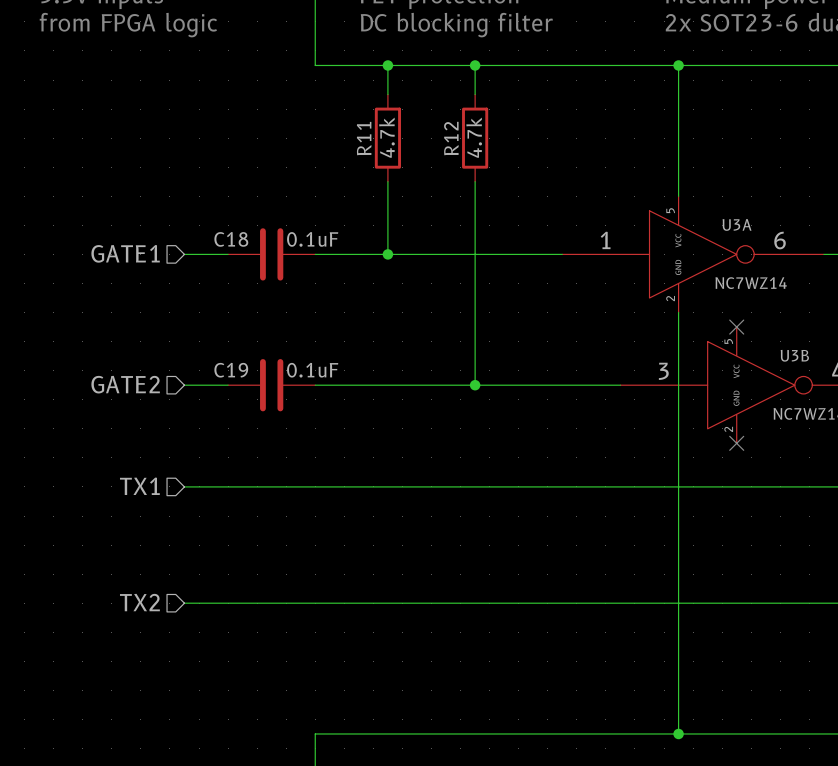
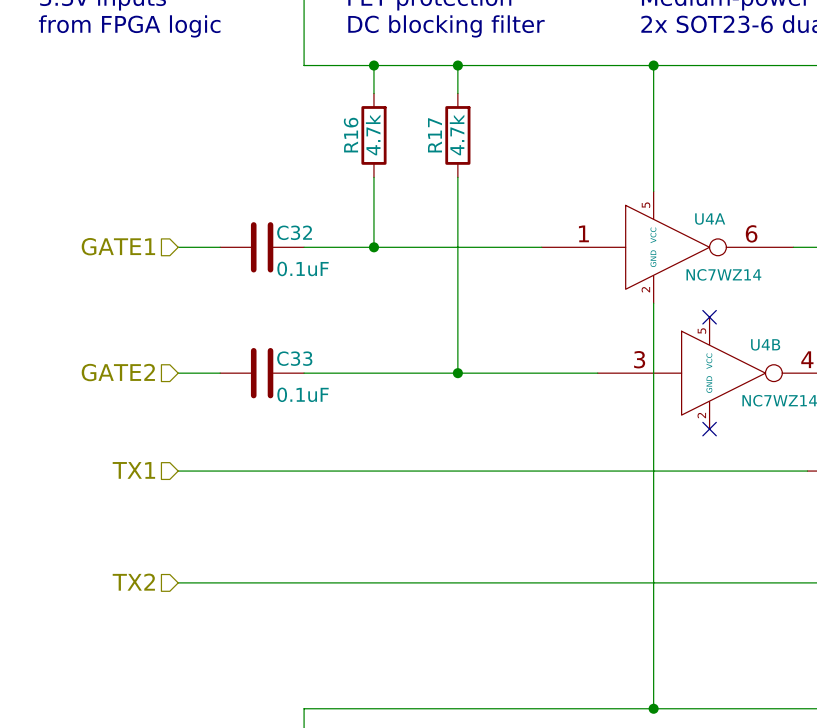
R11 name: R11 (364, 138) -> R16 (351, 135)
R12 name: R12 (451, 138) -> R17 (434, 135)
U3A name: U3A (737, 224) -> U4A (710, 219)
C18 name: C18 (231, 239) -> C32 (294, 232)
C18 value position: 0.1uF (312, 239) -> 0.1uF (303, 268)
U3B name: U3B (794, 355) -> U4B (765, 344)
C19 name: C19 (231, 370) -> C33 (294, 358)
C19 value position: 0.1uF (312, 370) -> 0.1uF (303, 394)

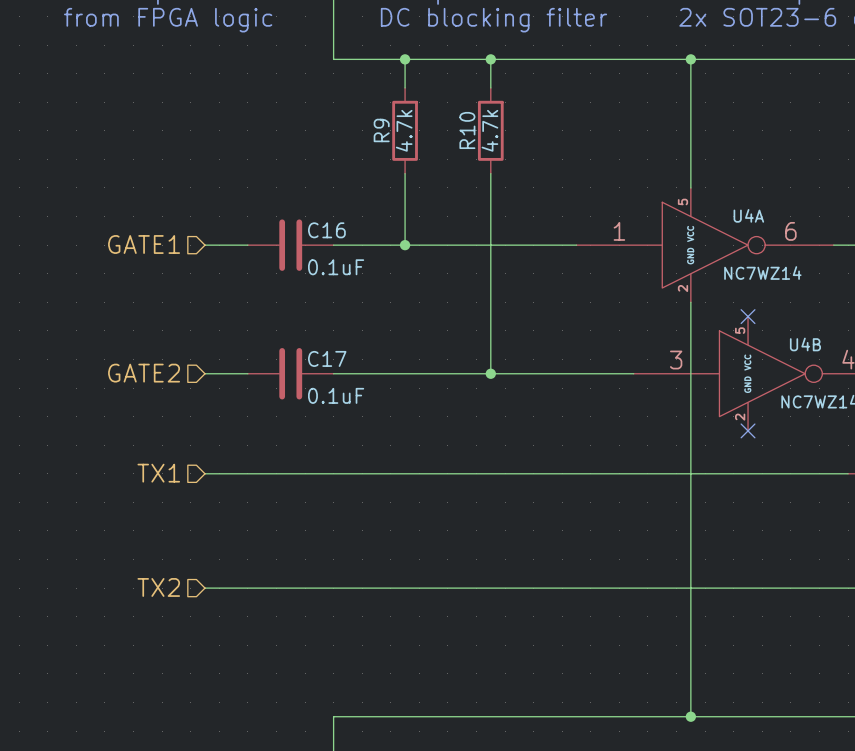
R16 name: R16 (351, 135) -> R9 (381, 130)
R17 name: R17 (434, 135) -> R10 (467, 130)
C32 name: C32 (294, 232) -> C16 (326, 230)
C33 name: C33 (294, 358) -> C17 (327, 358)

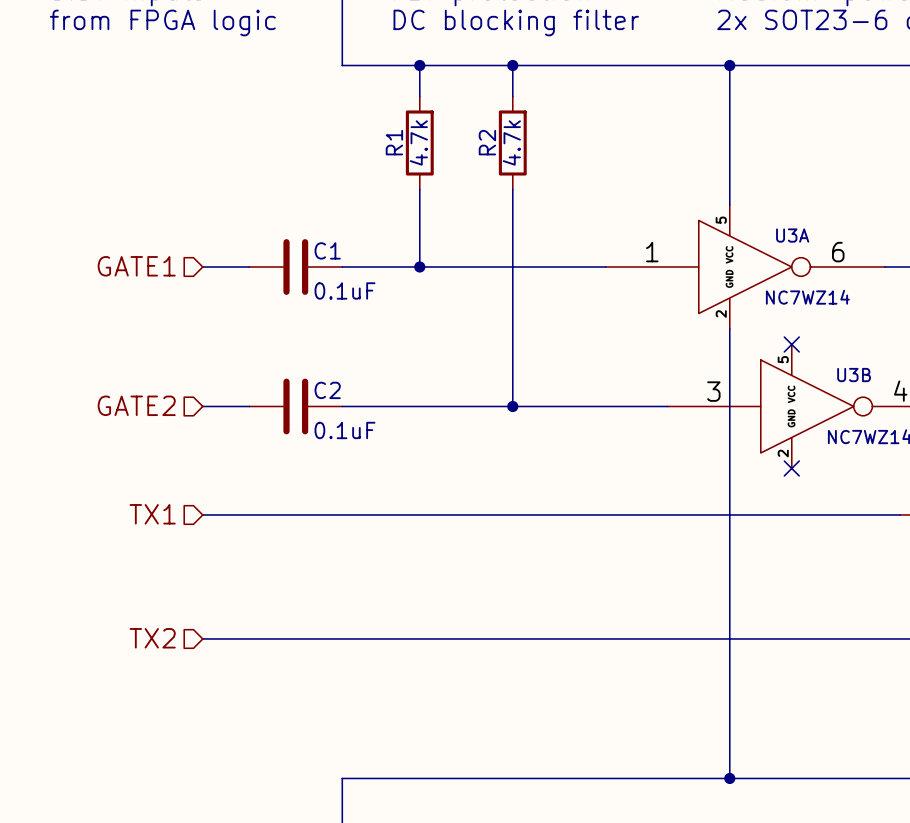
R9 name: R9 (381, 130) -> R1 (394, 142)
R10 name: R10 (467, 130) -> R2 (487, 142)
U4A name: U4A (748, 215) -> U3A (792, 235)
C16 name: C16 (326, 230) -> C1 (327, 250)
U4B name: U4B (805, 344) -> U3B (854, 375)
C17 name: C17 (327, 358) -> C2 (327, 390)

